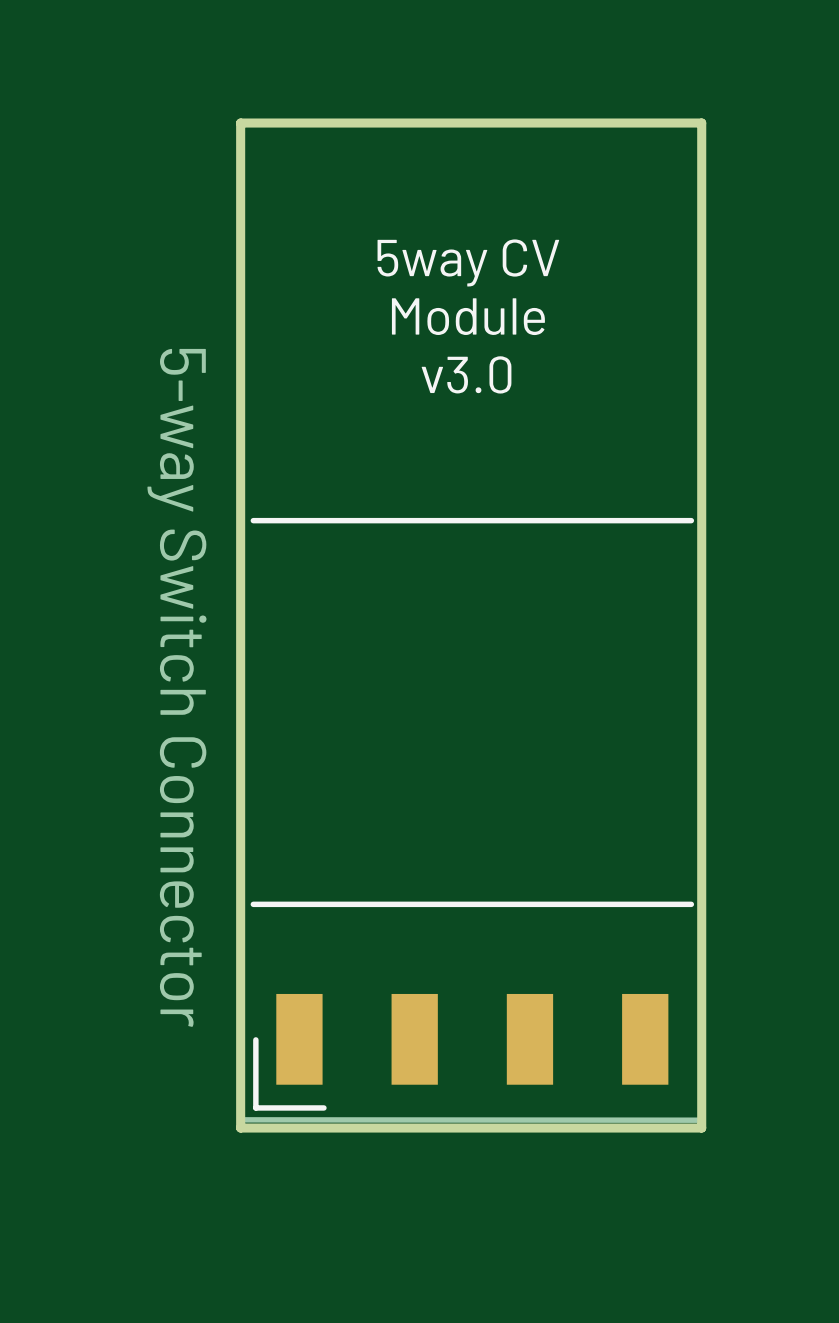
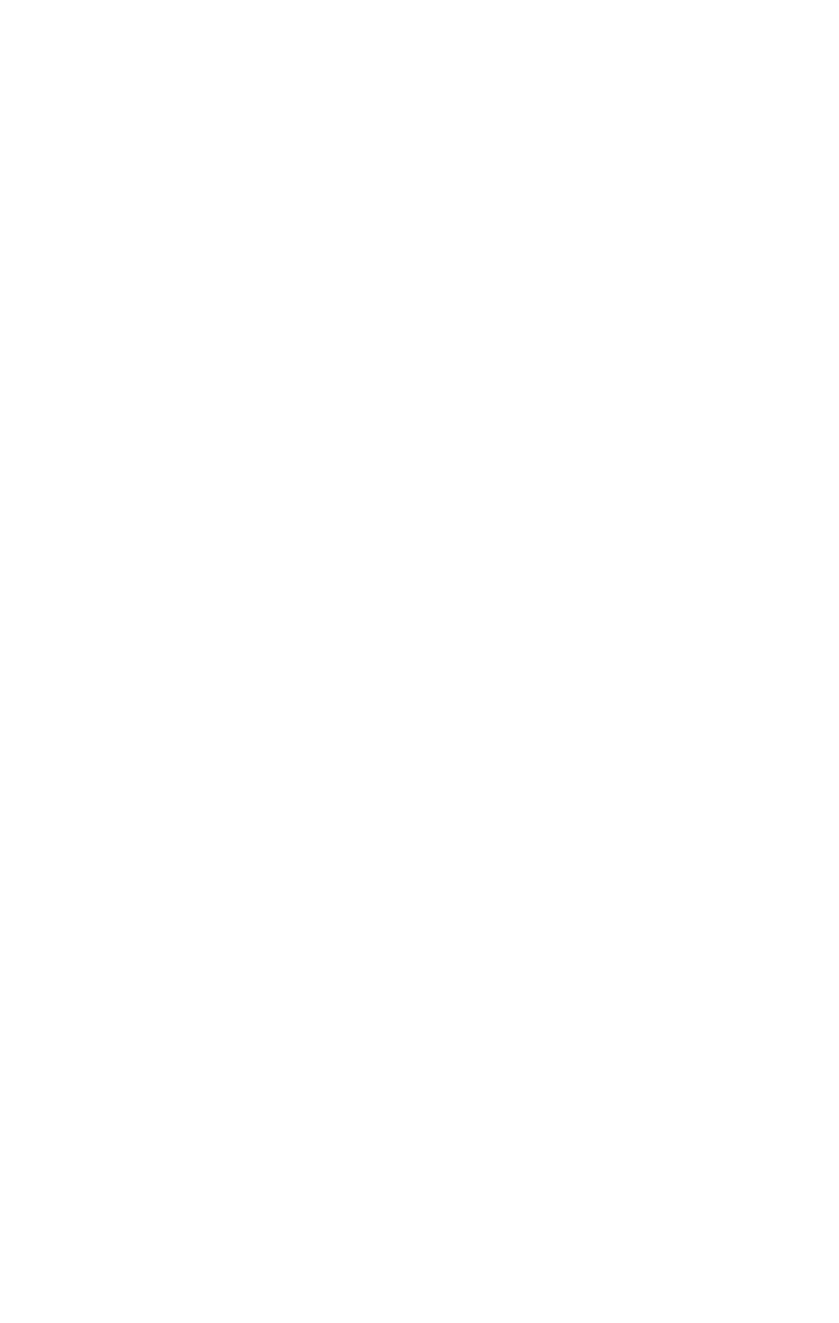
board edge: (701, 123) (240, 123) (240, 1128) (701, 1128) (701, 123) -> none
text: 5way CV (468, 262) -> none
text: Module (468, 316) -> none
text: v3.0 (466, 374) -> none
part: 5-way Switch Connector (472, 820) -> none

